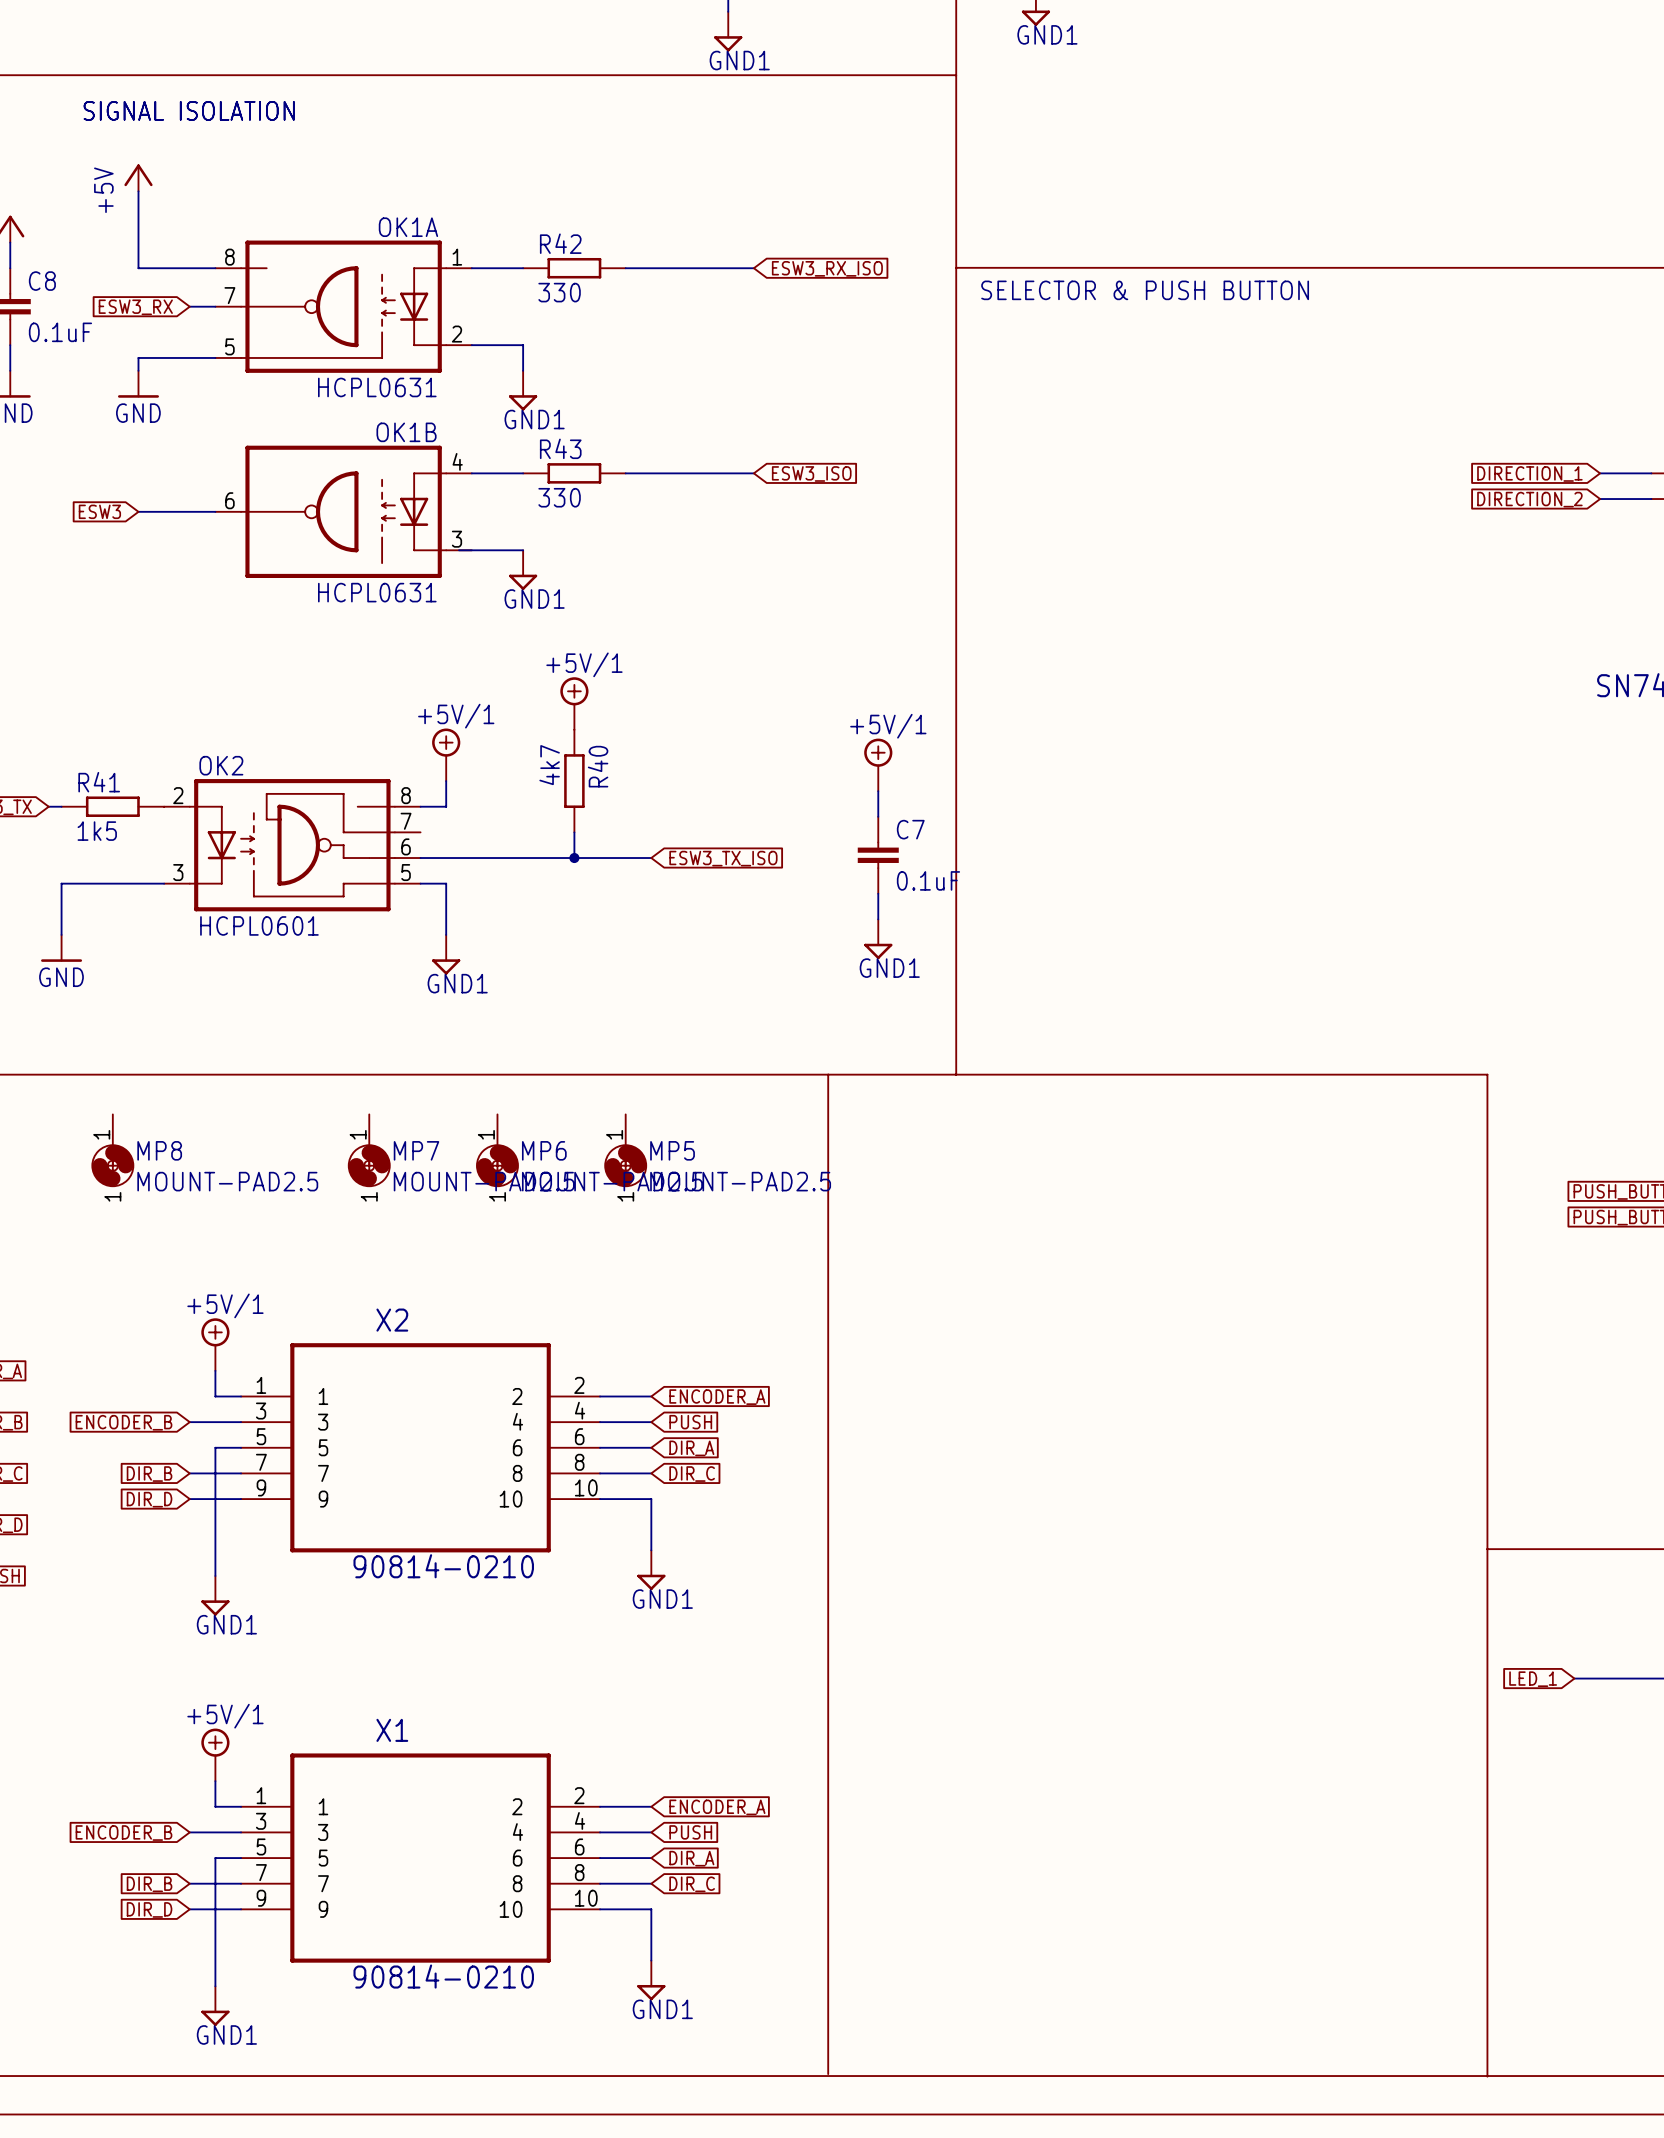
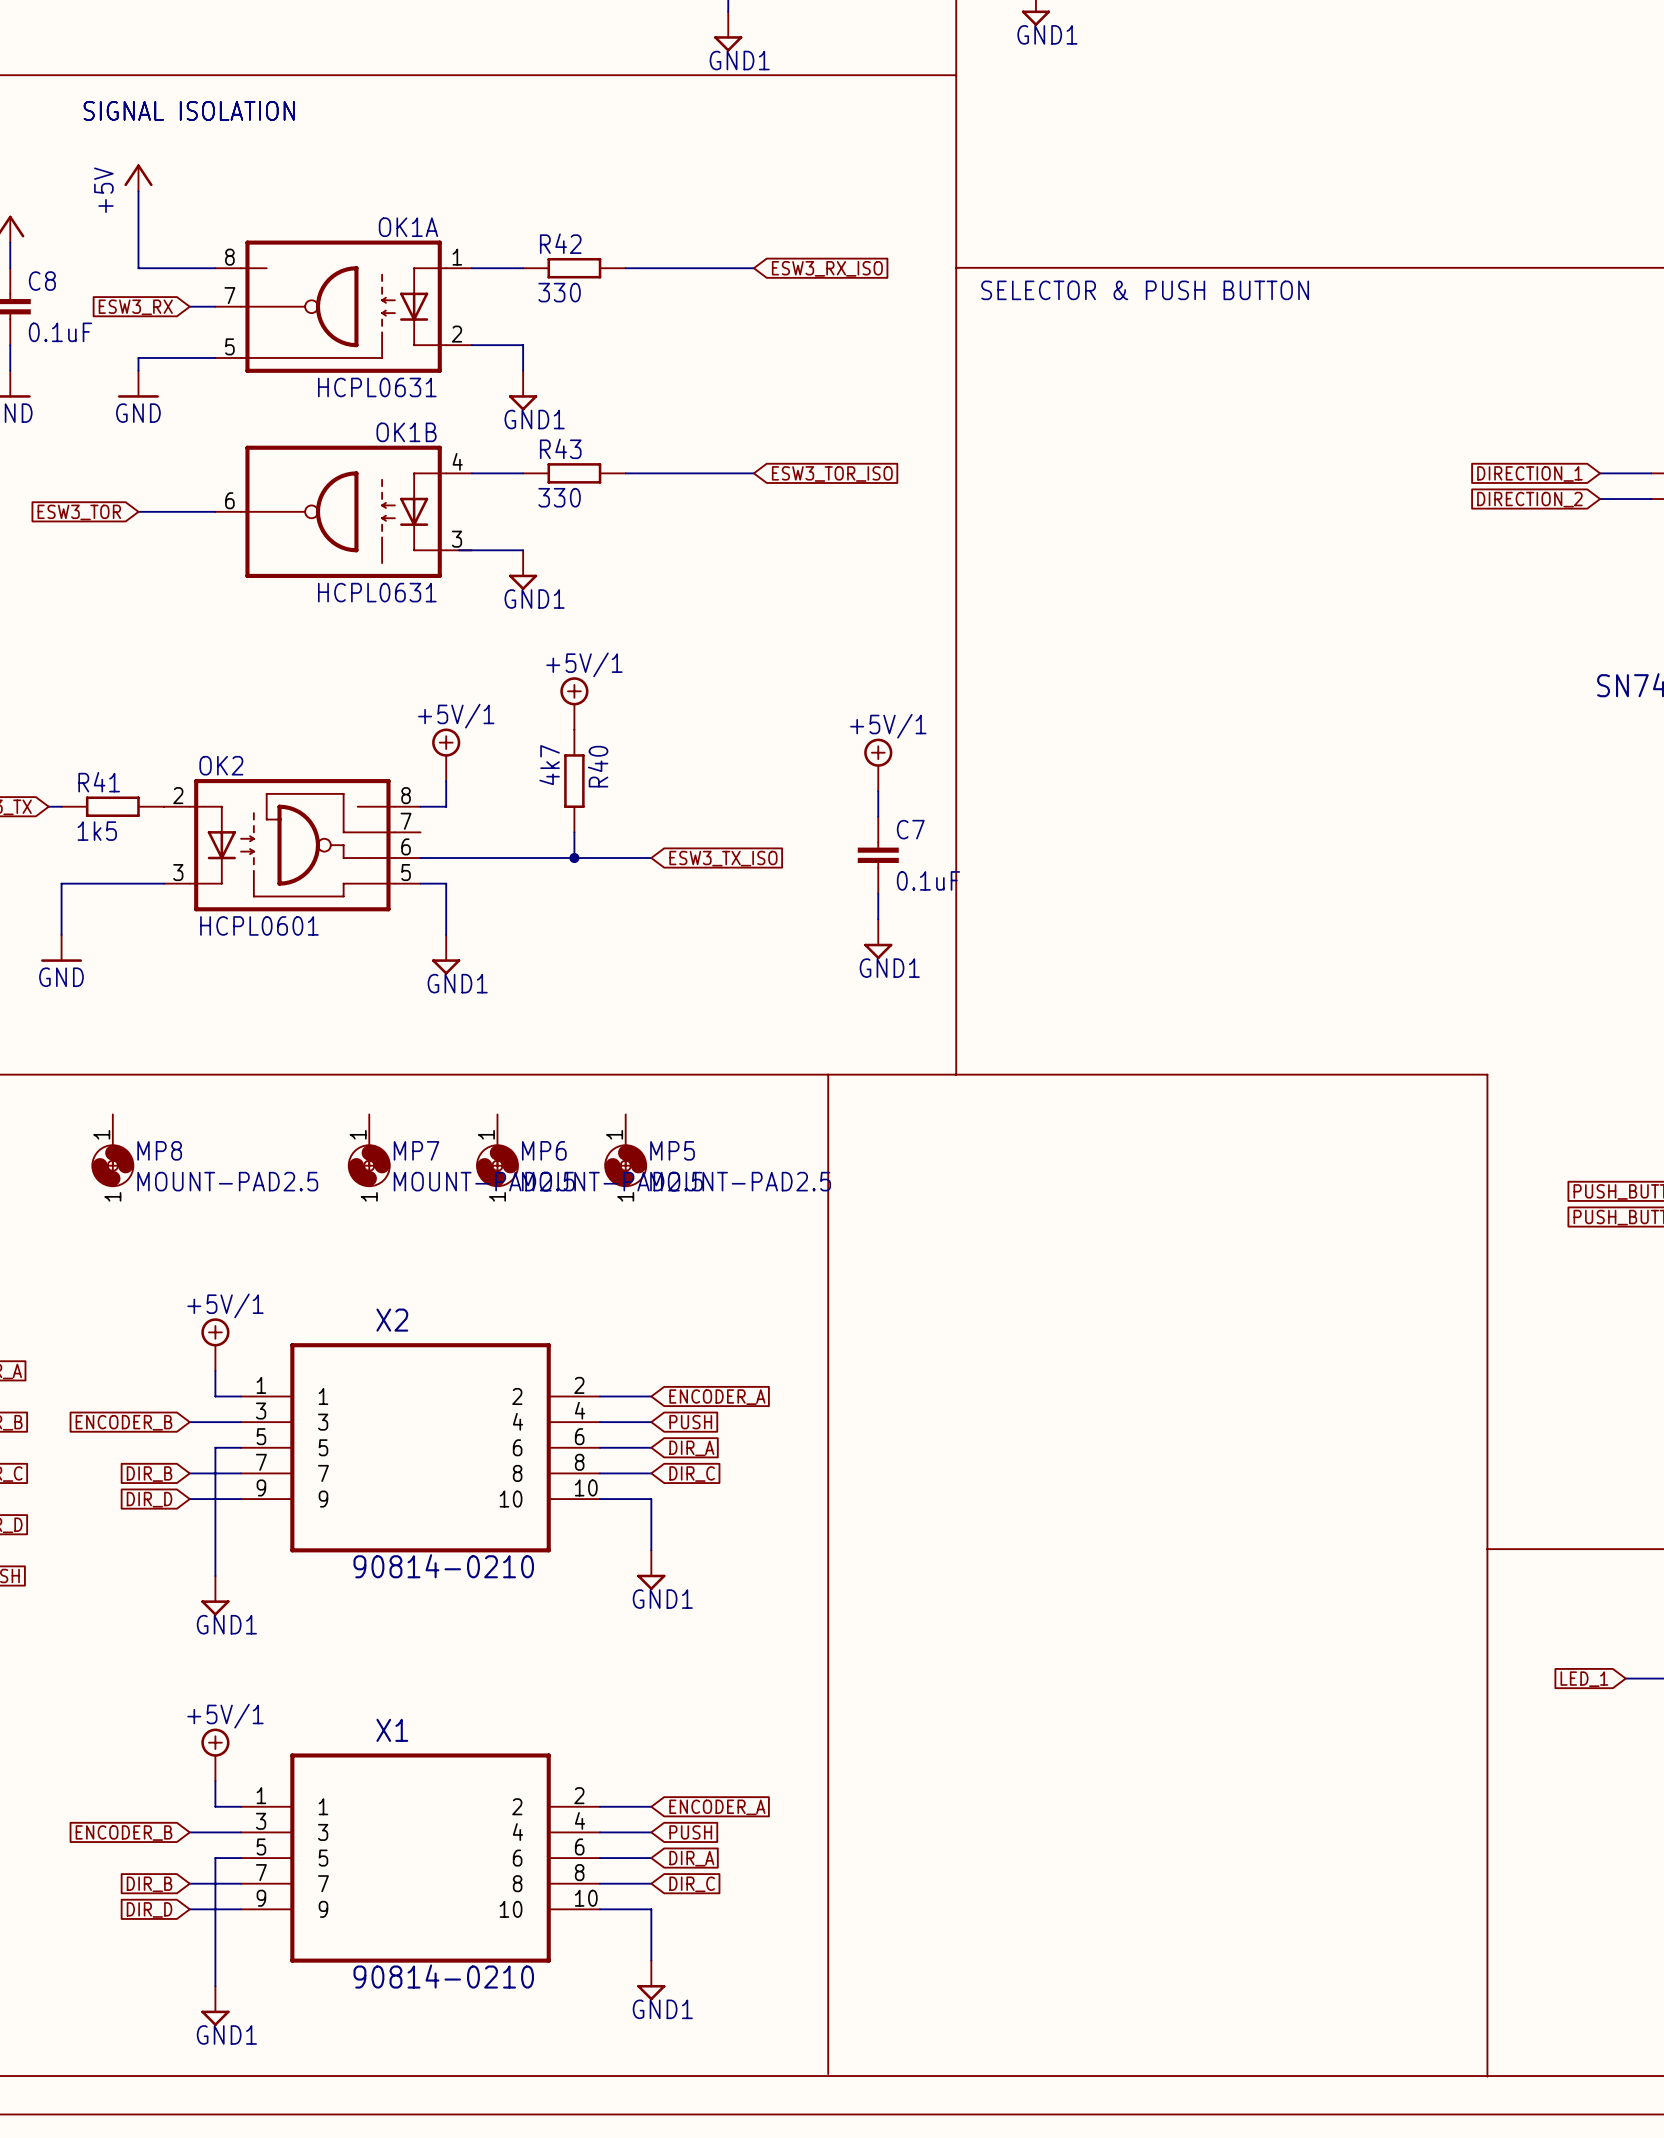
global label: ESW3_ISO (811, 473) -> ESW3_TOR_ISO (832, 473)
global label: ESW3 (99, 511) -> ESW3_TOR (79, 512)
wire: (1574, 1678) (1625, 1678) -> none
global label position: LED_1 (1533, 1679) -> LED_1 (1584, 1679)

